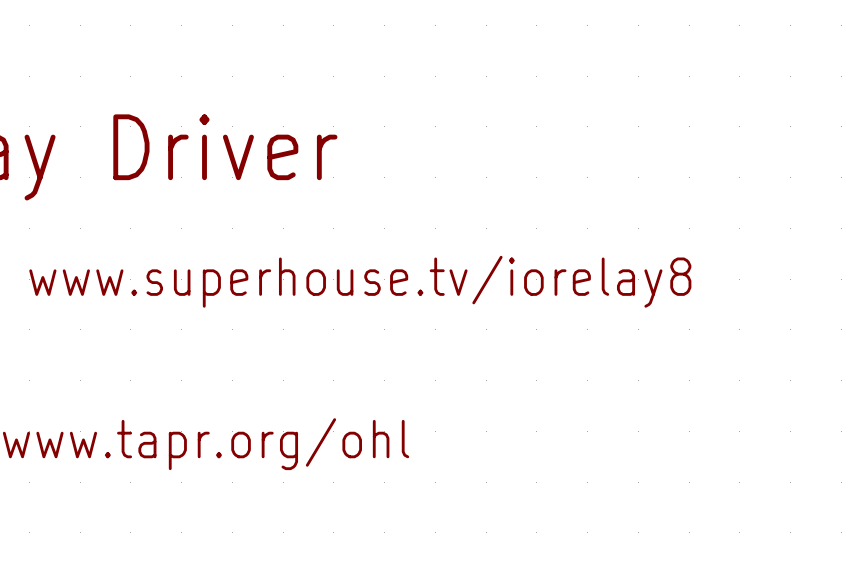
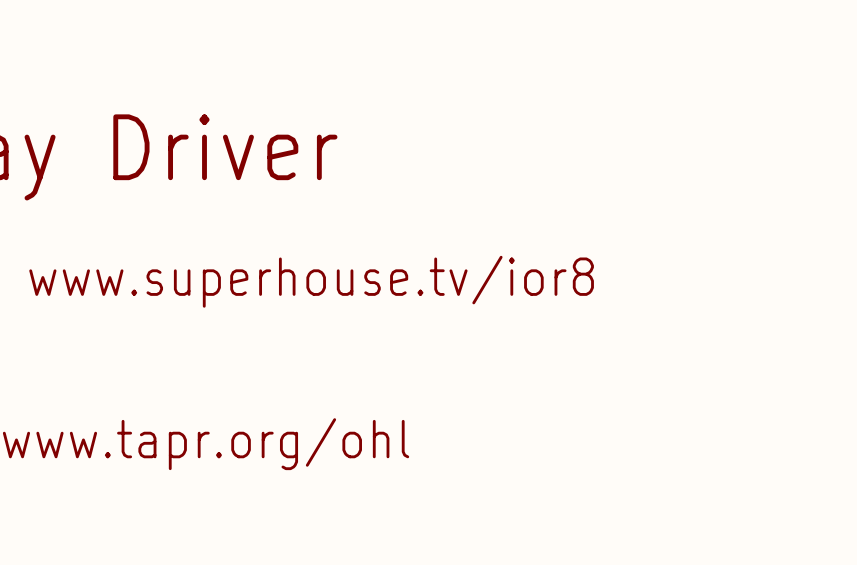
text: www.superhouse.tv/iorelay8 (360, 281) -> www.superhouse.tv/ior8 (311, 281)

